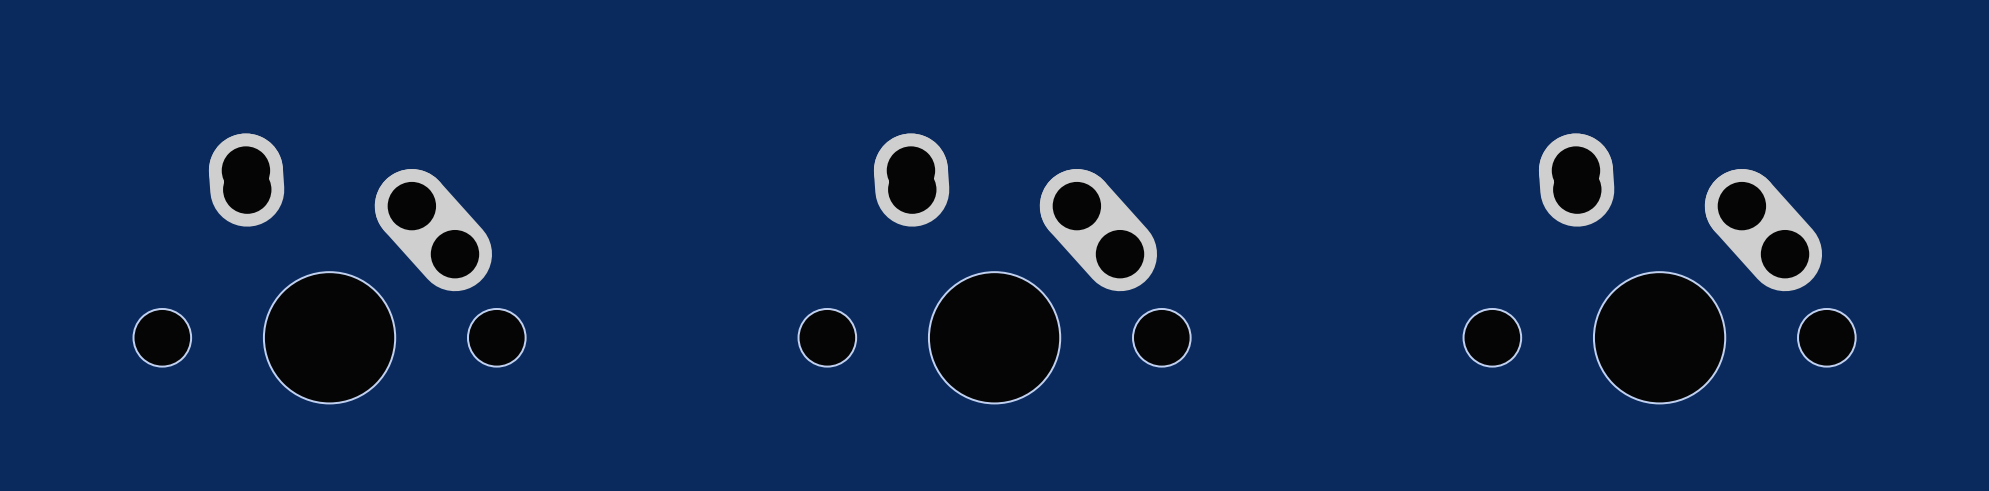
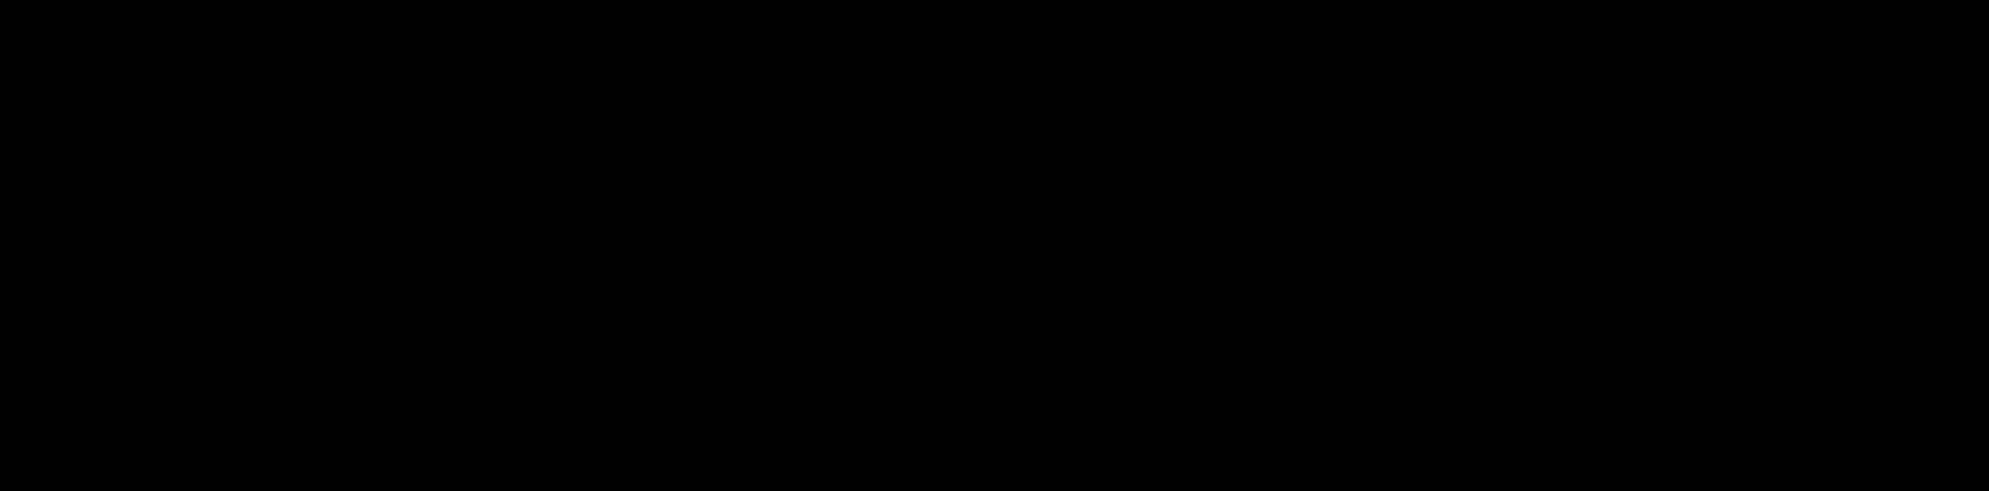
part: (329, 268) -> none
part: (994, 268) -> none
part: (1659, 268) -> none

